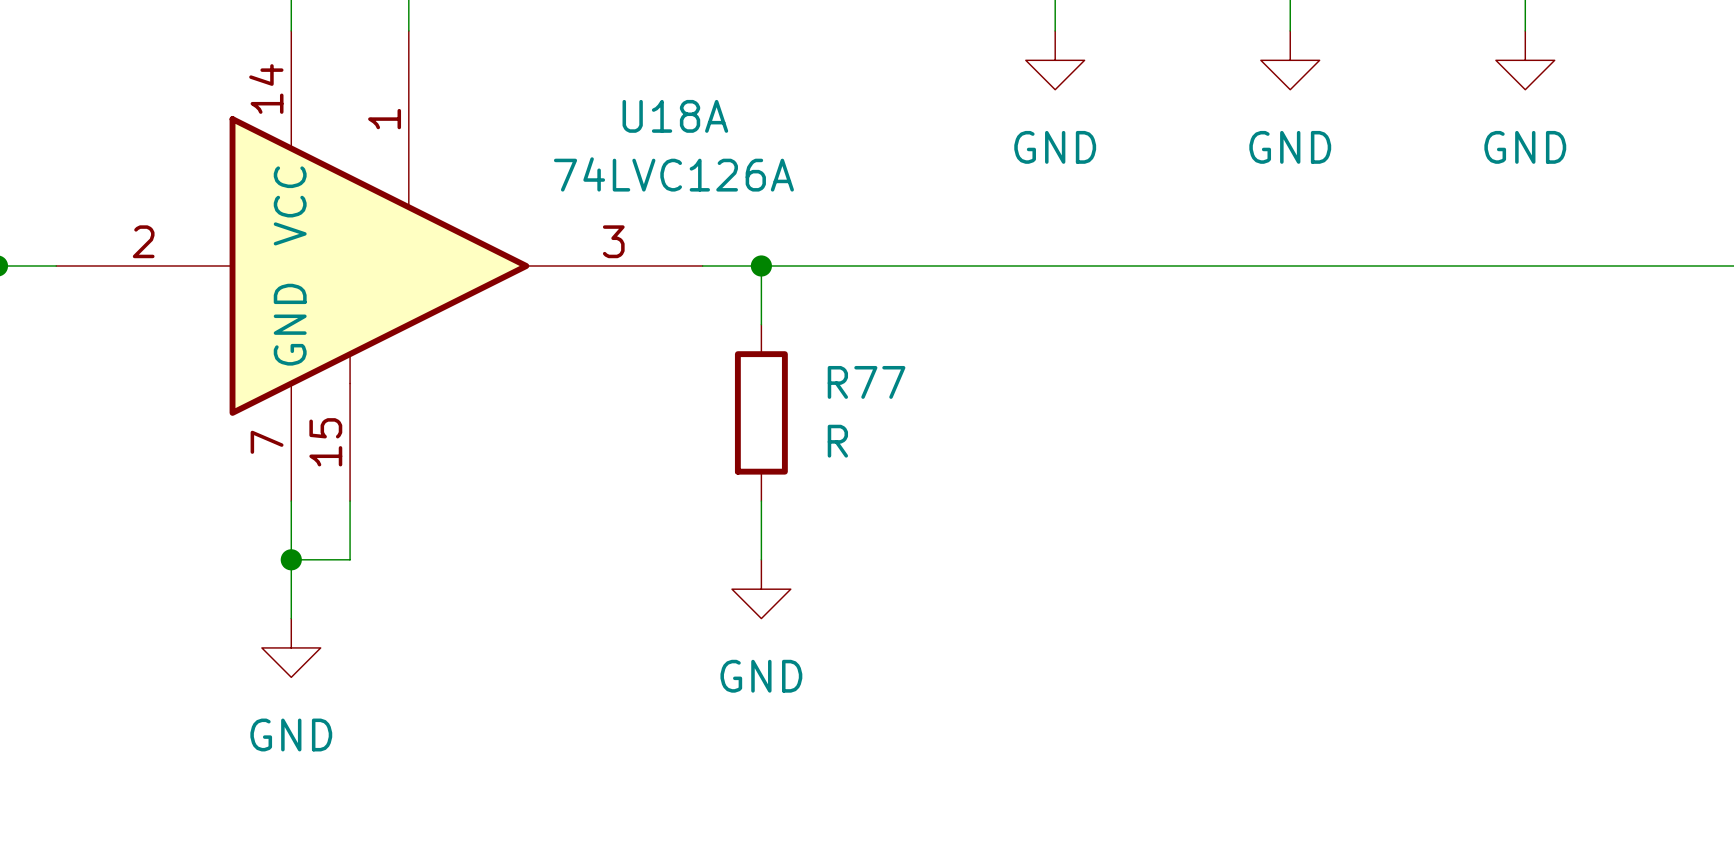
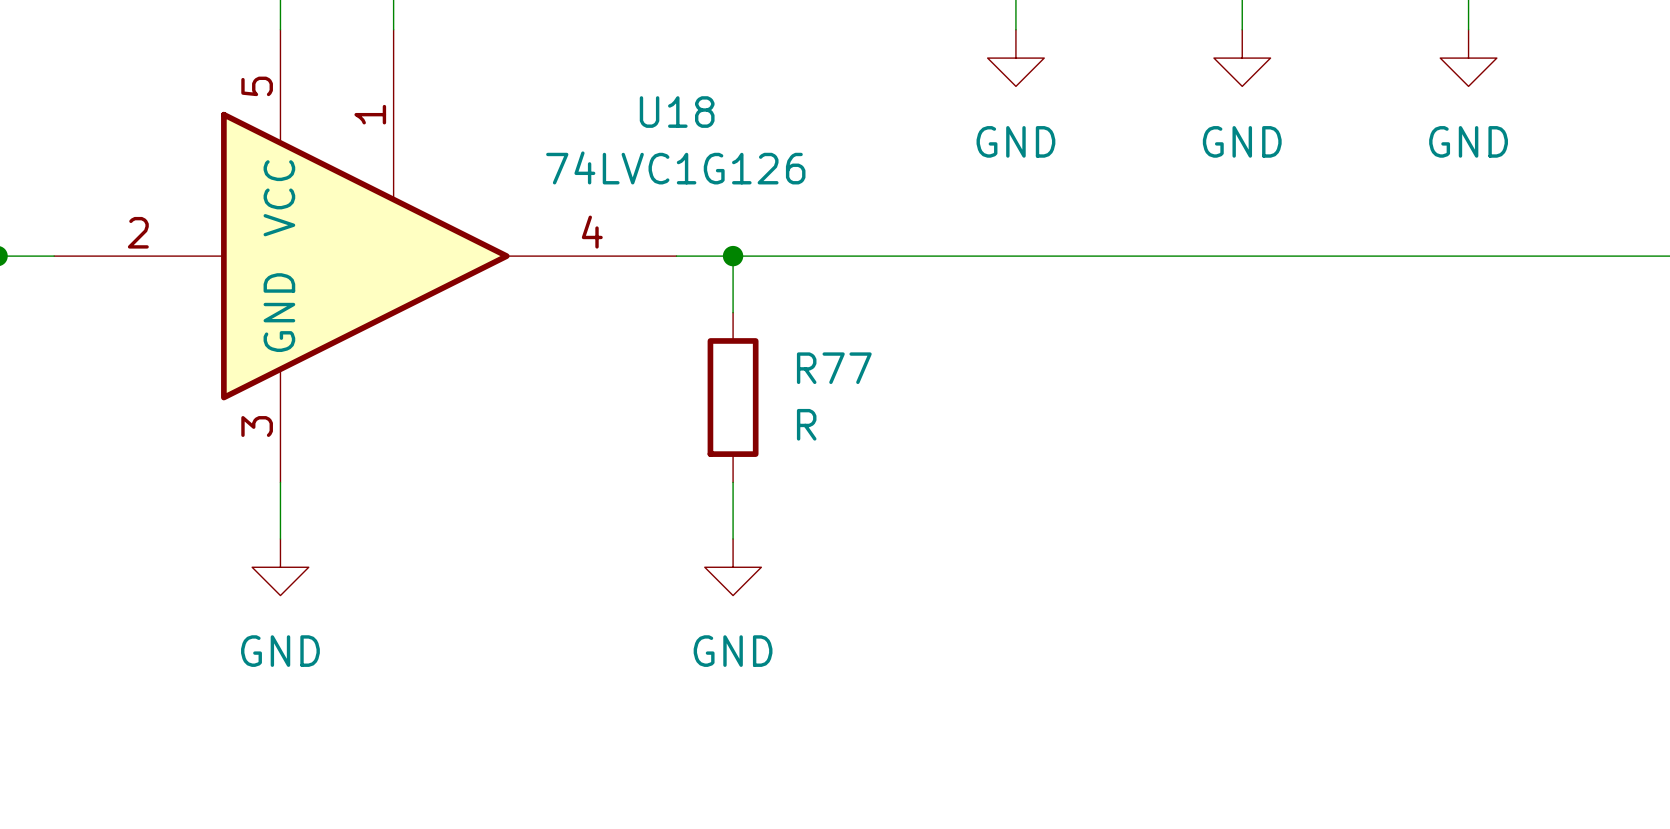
U18A: 74LVC126A (379, 265) -> none
U18: none -> 74LVC1G126 (365, 256)
wire: (350, 501) (350, 559) (291, 559) (291, 618) -> none
junction: (291, 559) -> none
power symbol position: GND (291, 647) -> GND (280, 567)

